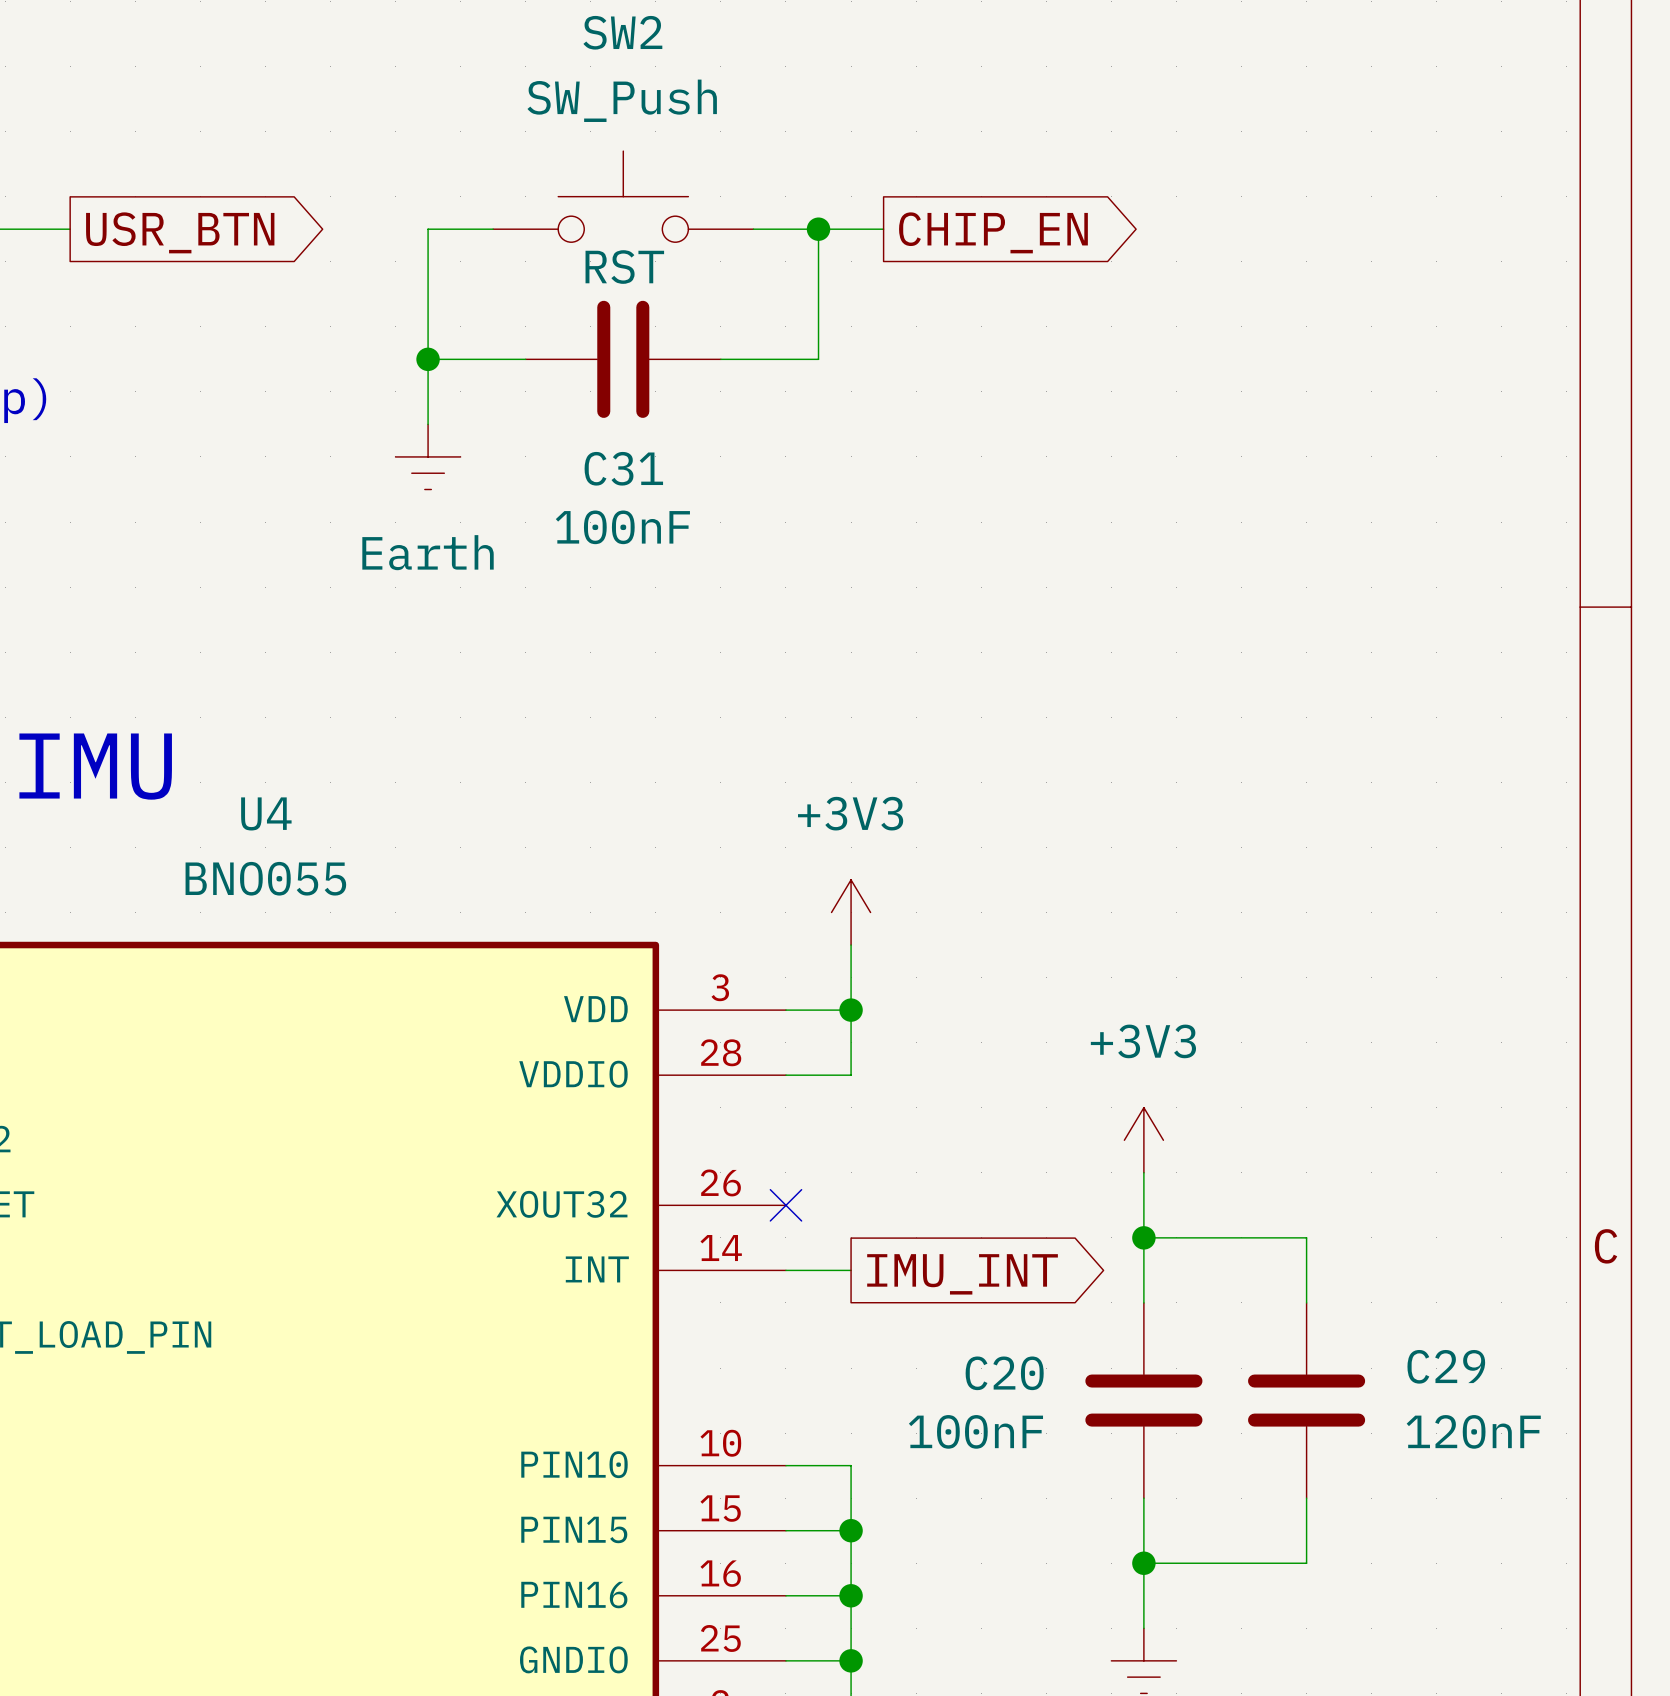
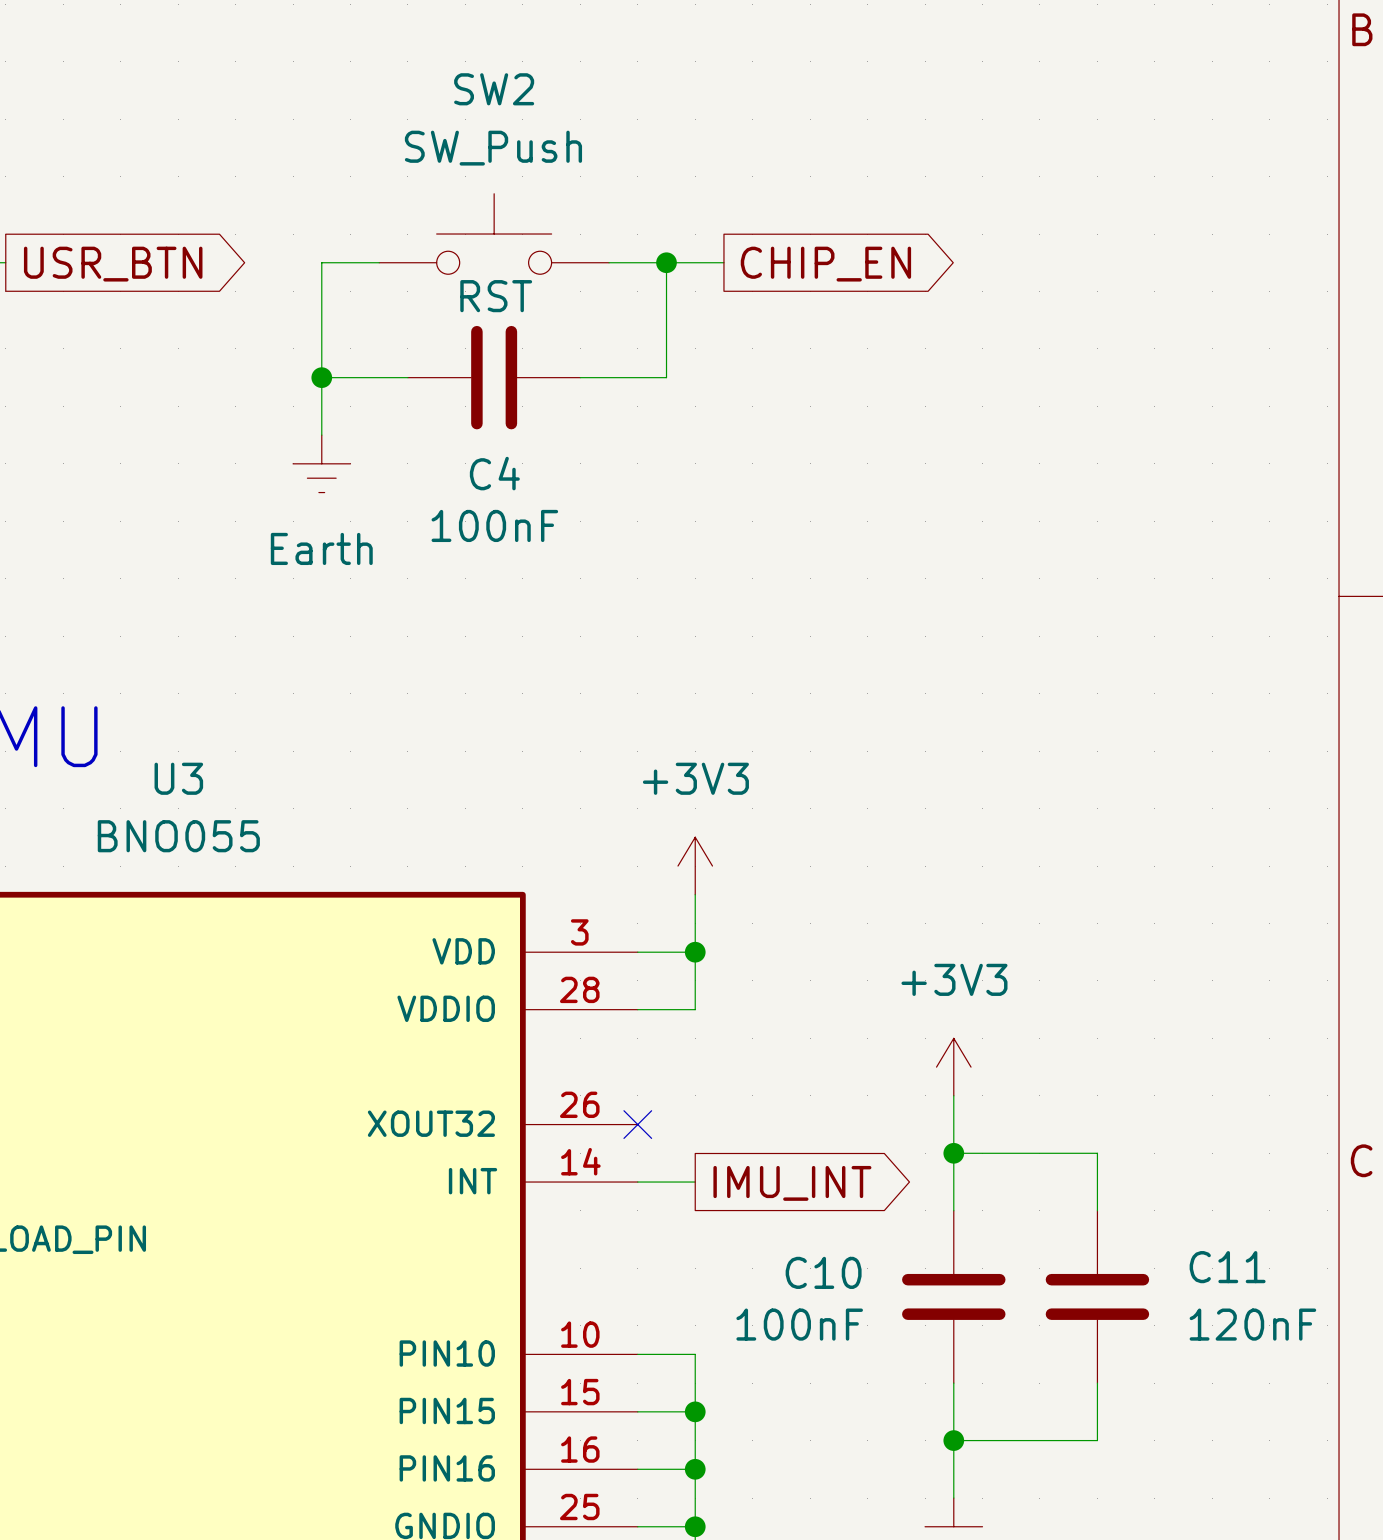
C31 name: C31 (623, 468) -> C4 (494, 473)
U4 name: U4 (266, 813) -> U3 (178, 778)
C29 name: C29 (1446, 1366) -> C11 (1227, 1267)
C20 name: C20 (1004, 1373) -> C10 (823, 1272)

